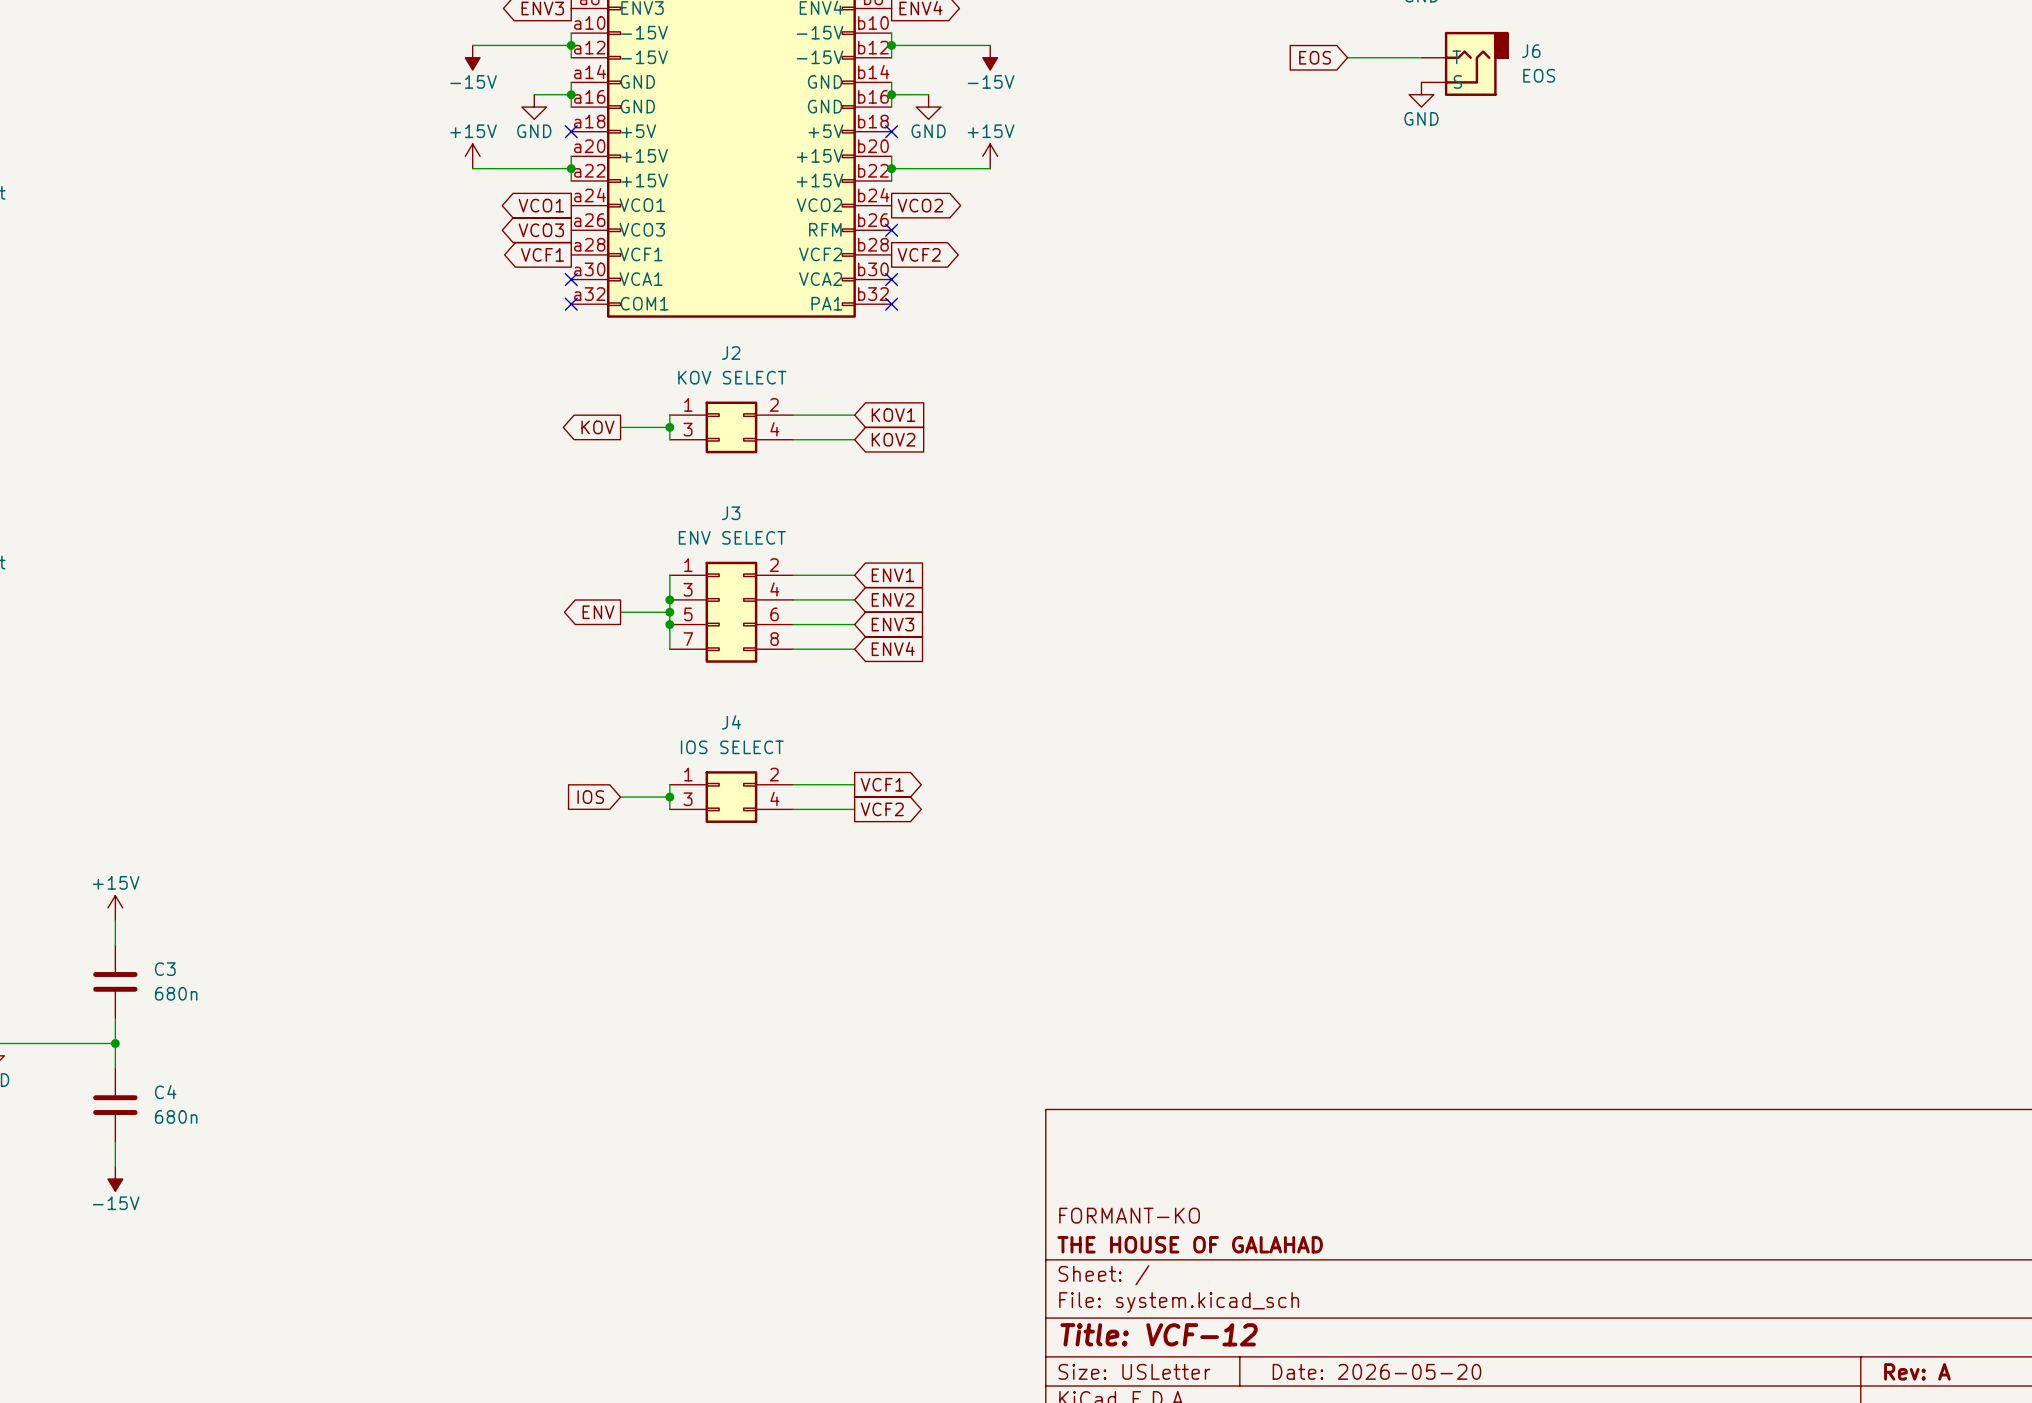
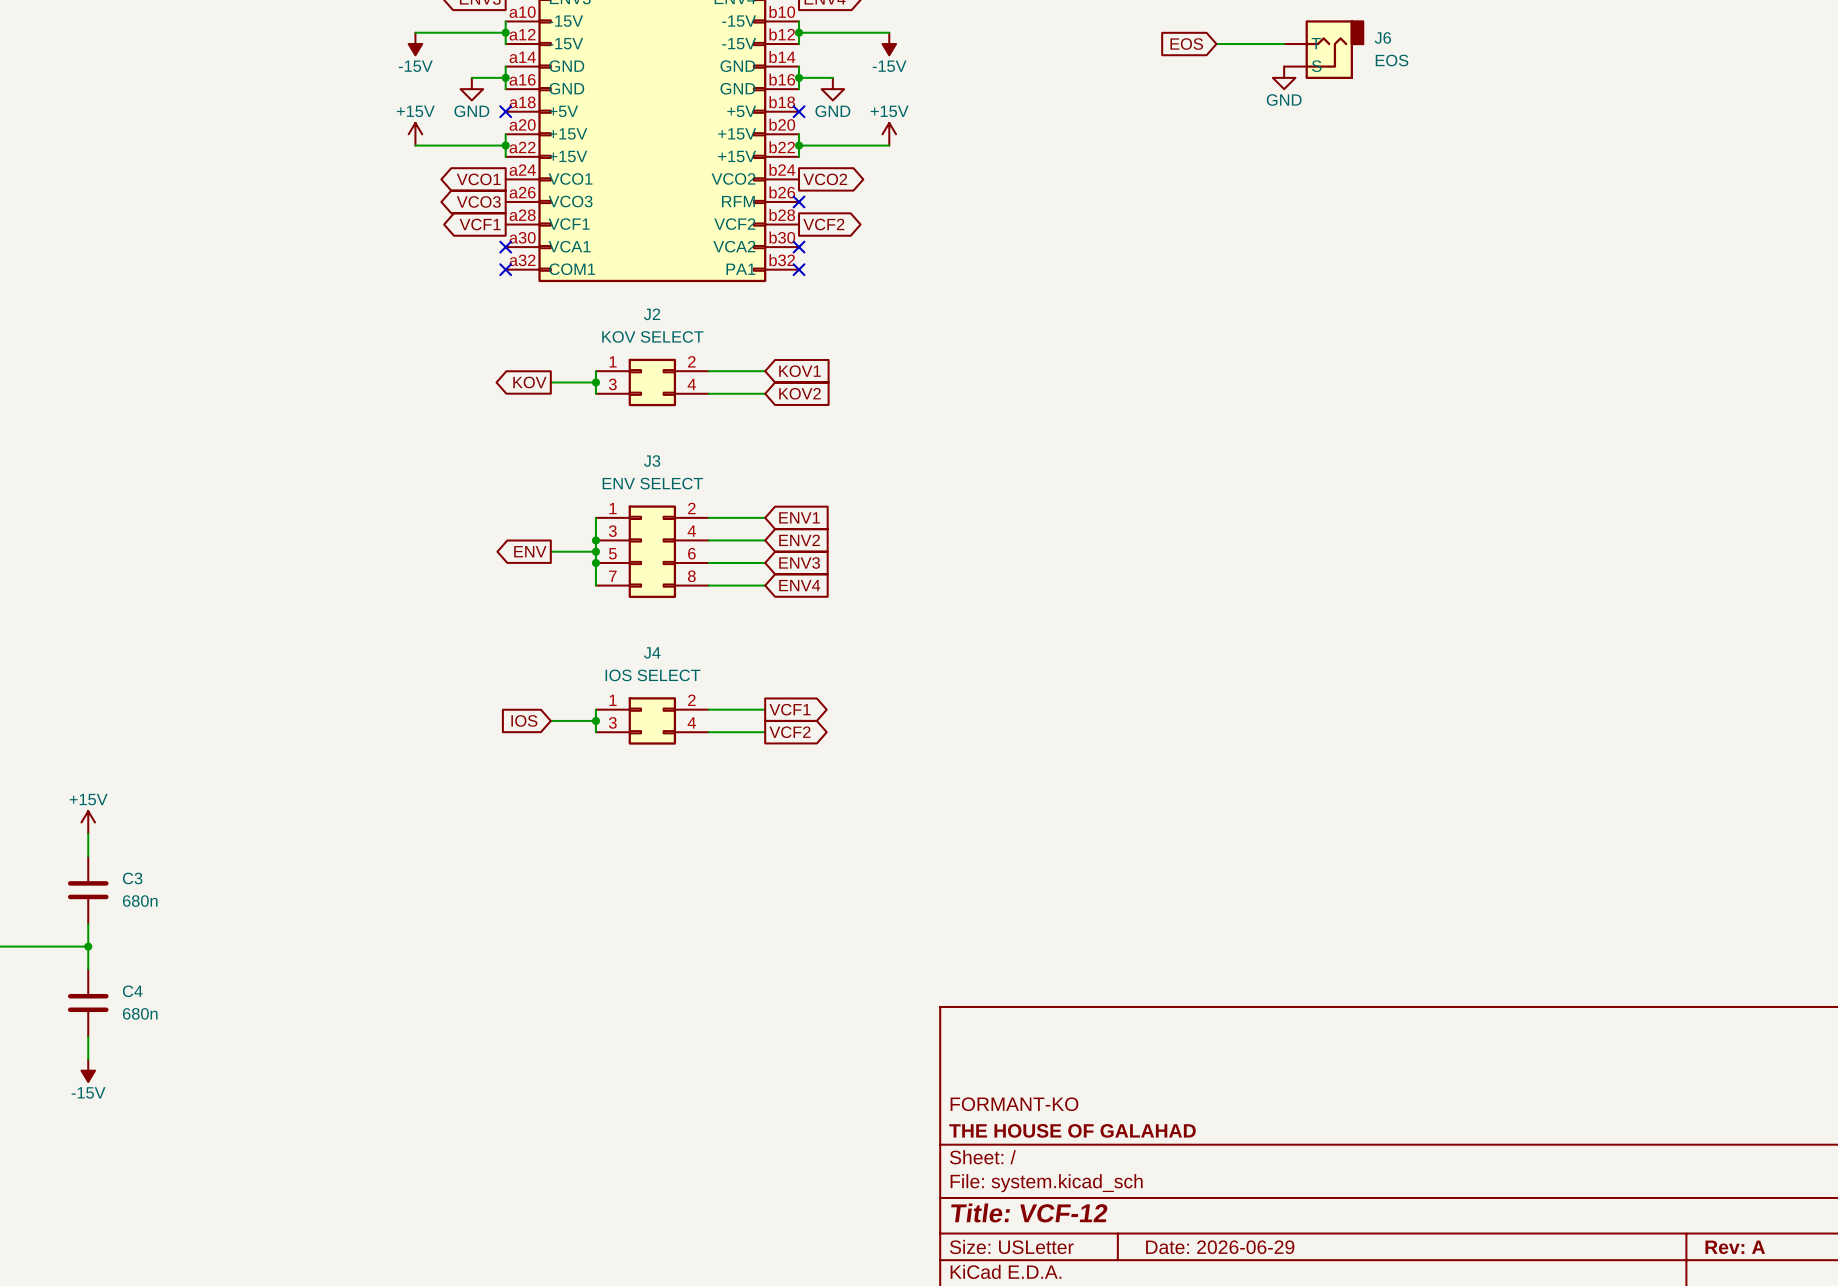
title block: Date: 2026-05-20 (1376, 1371) -> Date: 2026-06-29 (1220, 1247)

